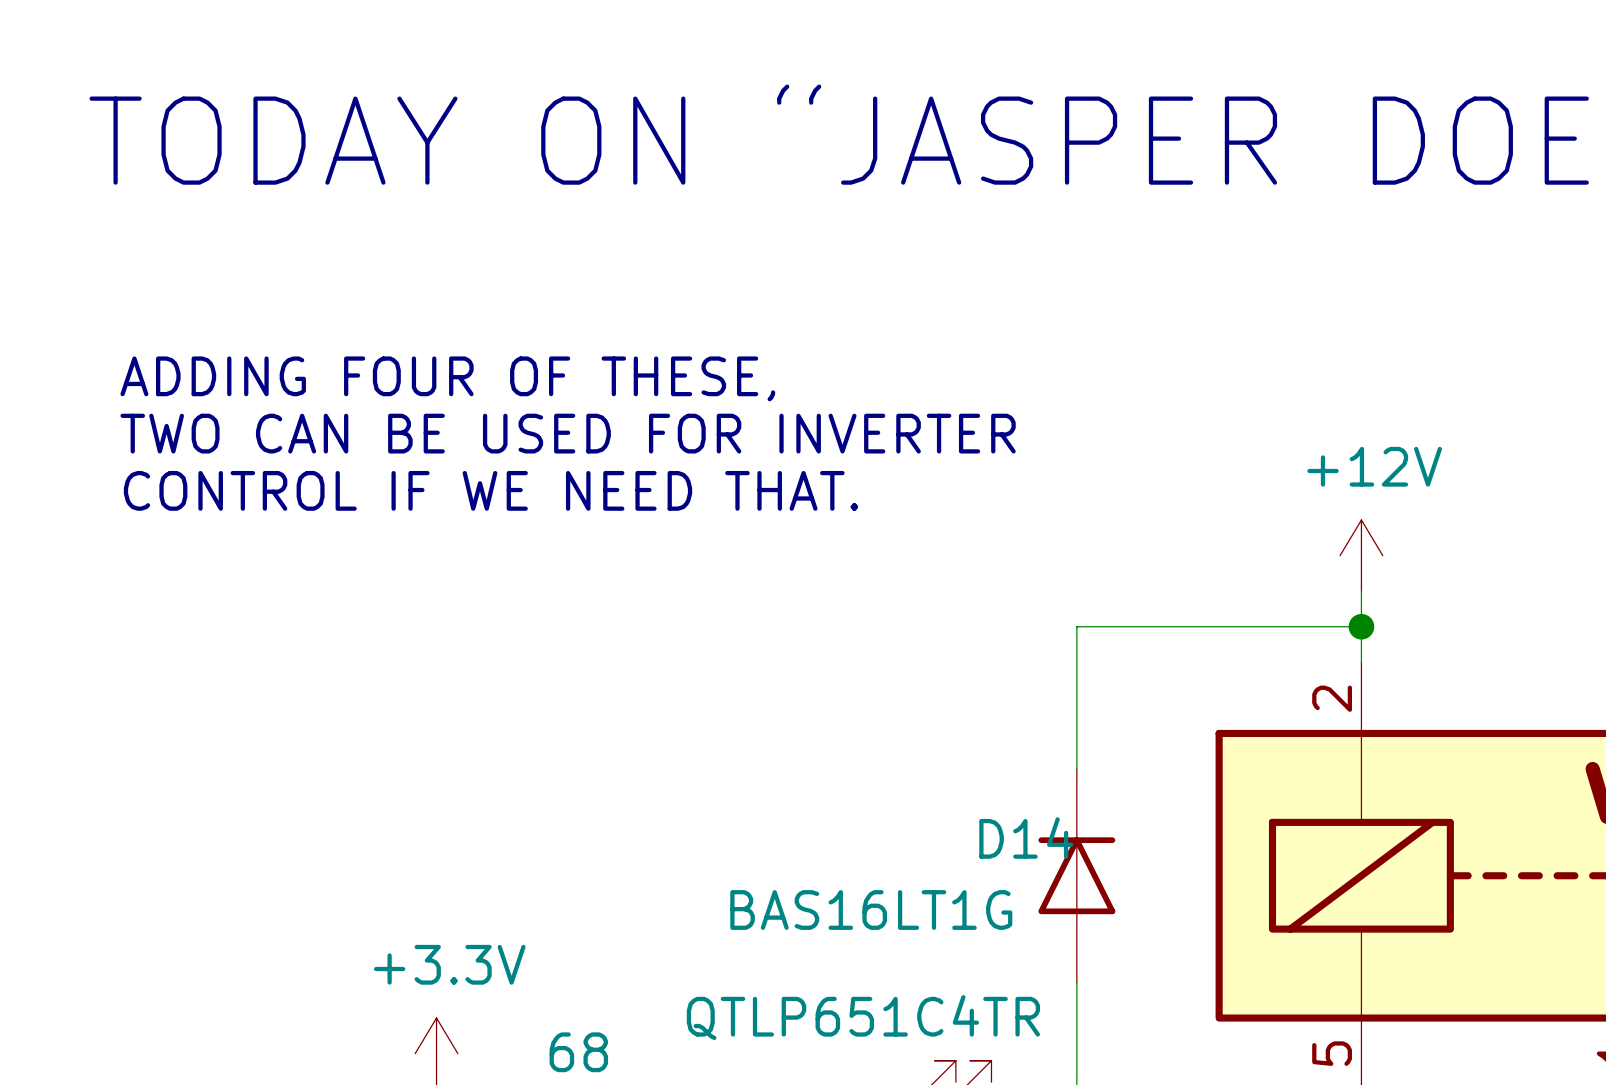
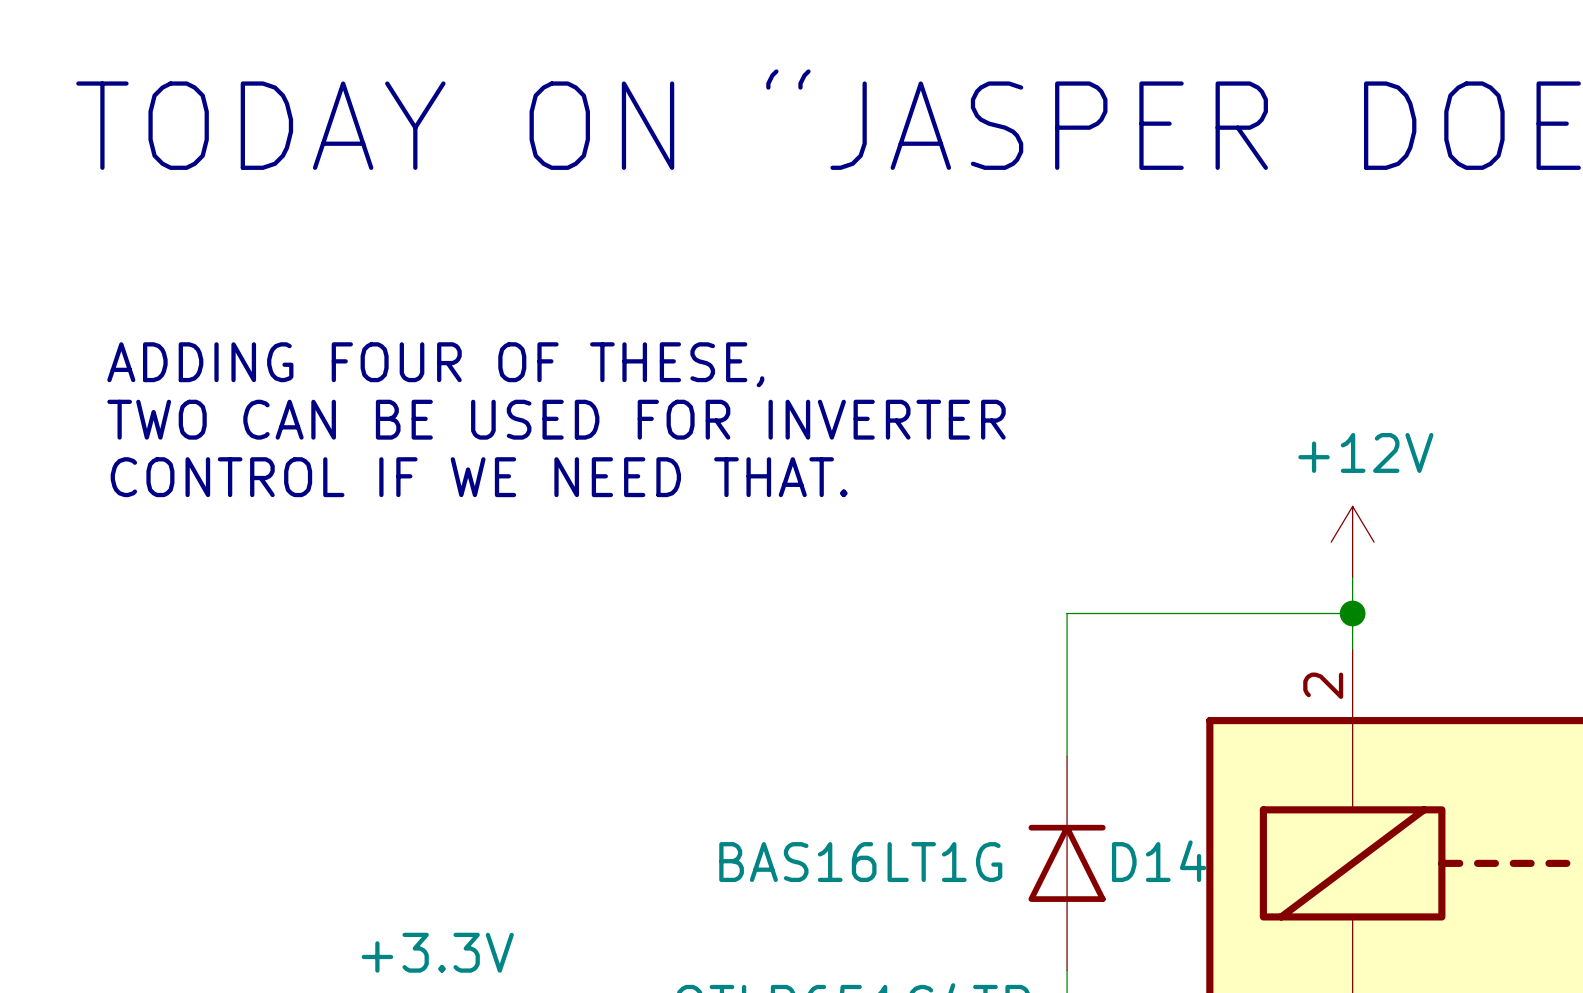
D14 name position: D14 (1026, 838) -> D14 (1159, 861)
D14 value position: BAS16LT1G (871, 909) -> BAS16LT1G (860, 862)

